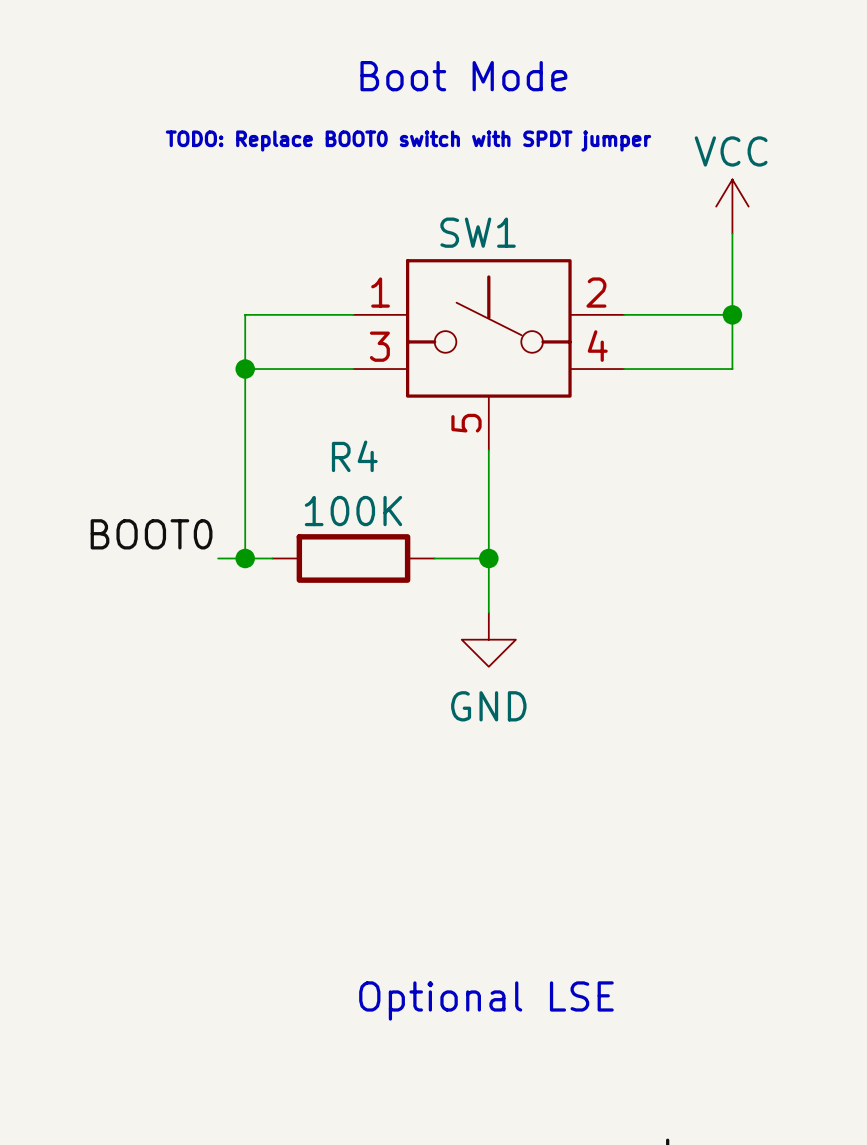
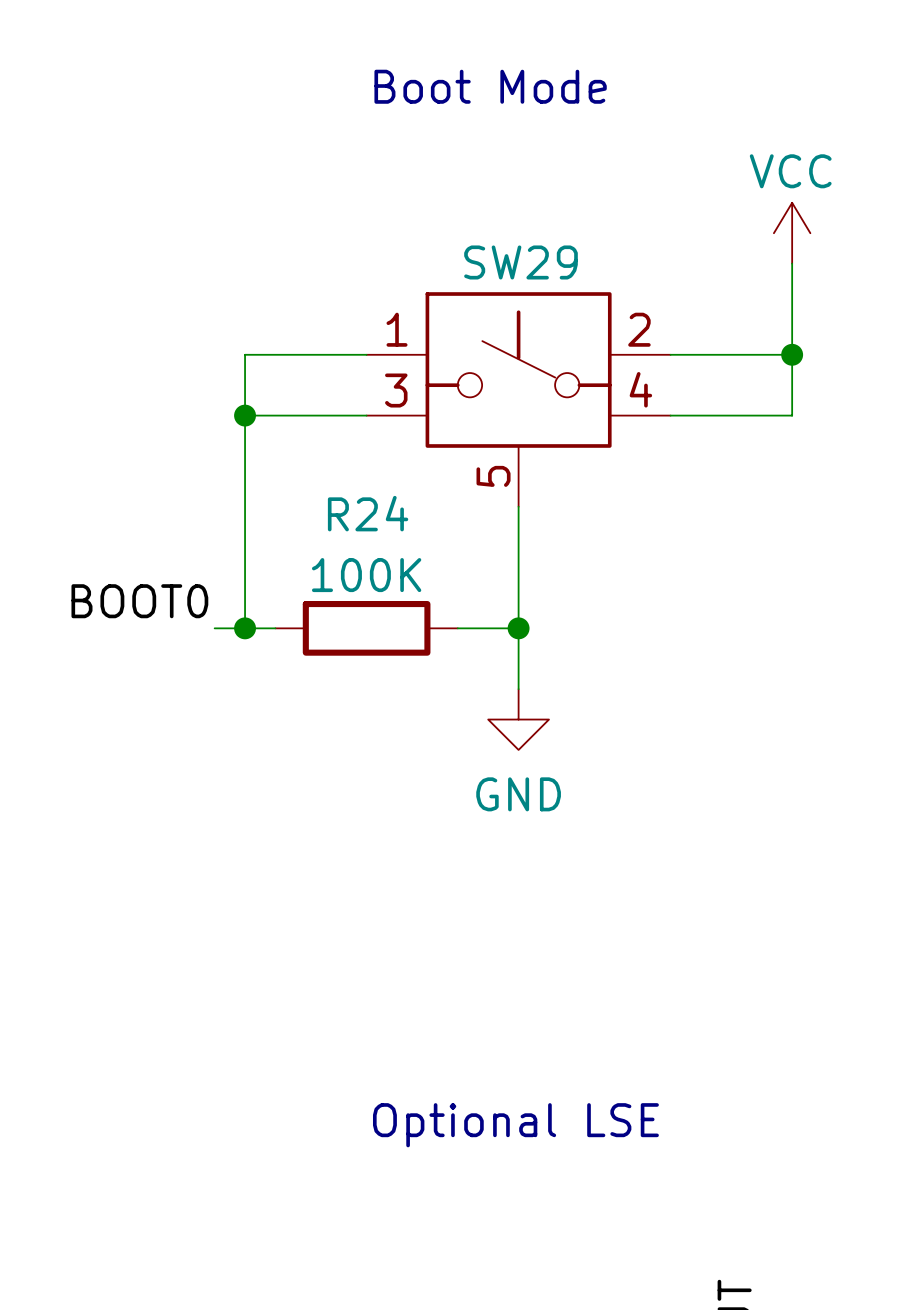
text: TODO: Replace BOOT0 switch with SPDT jumper (408, 141) -> none
SW1 name: SW1 (478, 232) -> SW29 (520, 262)
R4 name: R4 (354, 456) -> R24 (368, 513)

